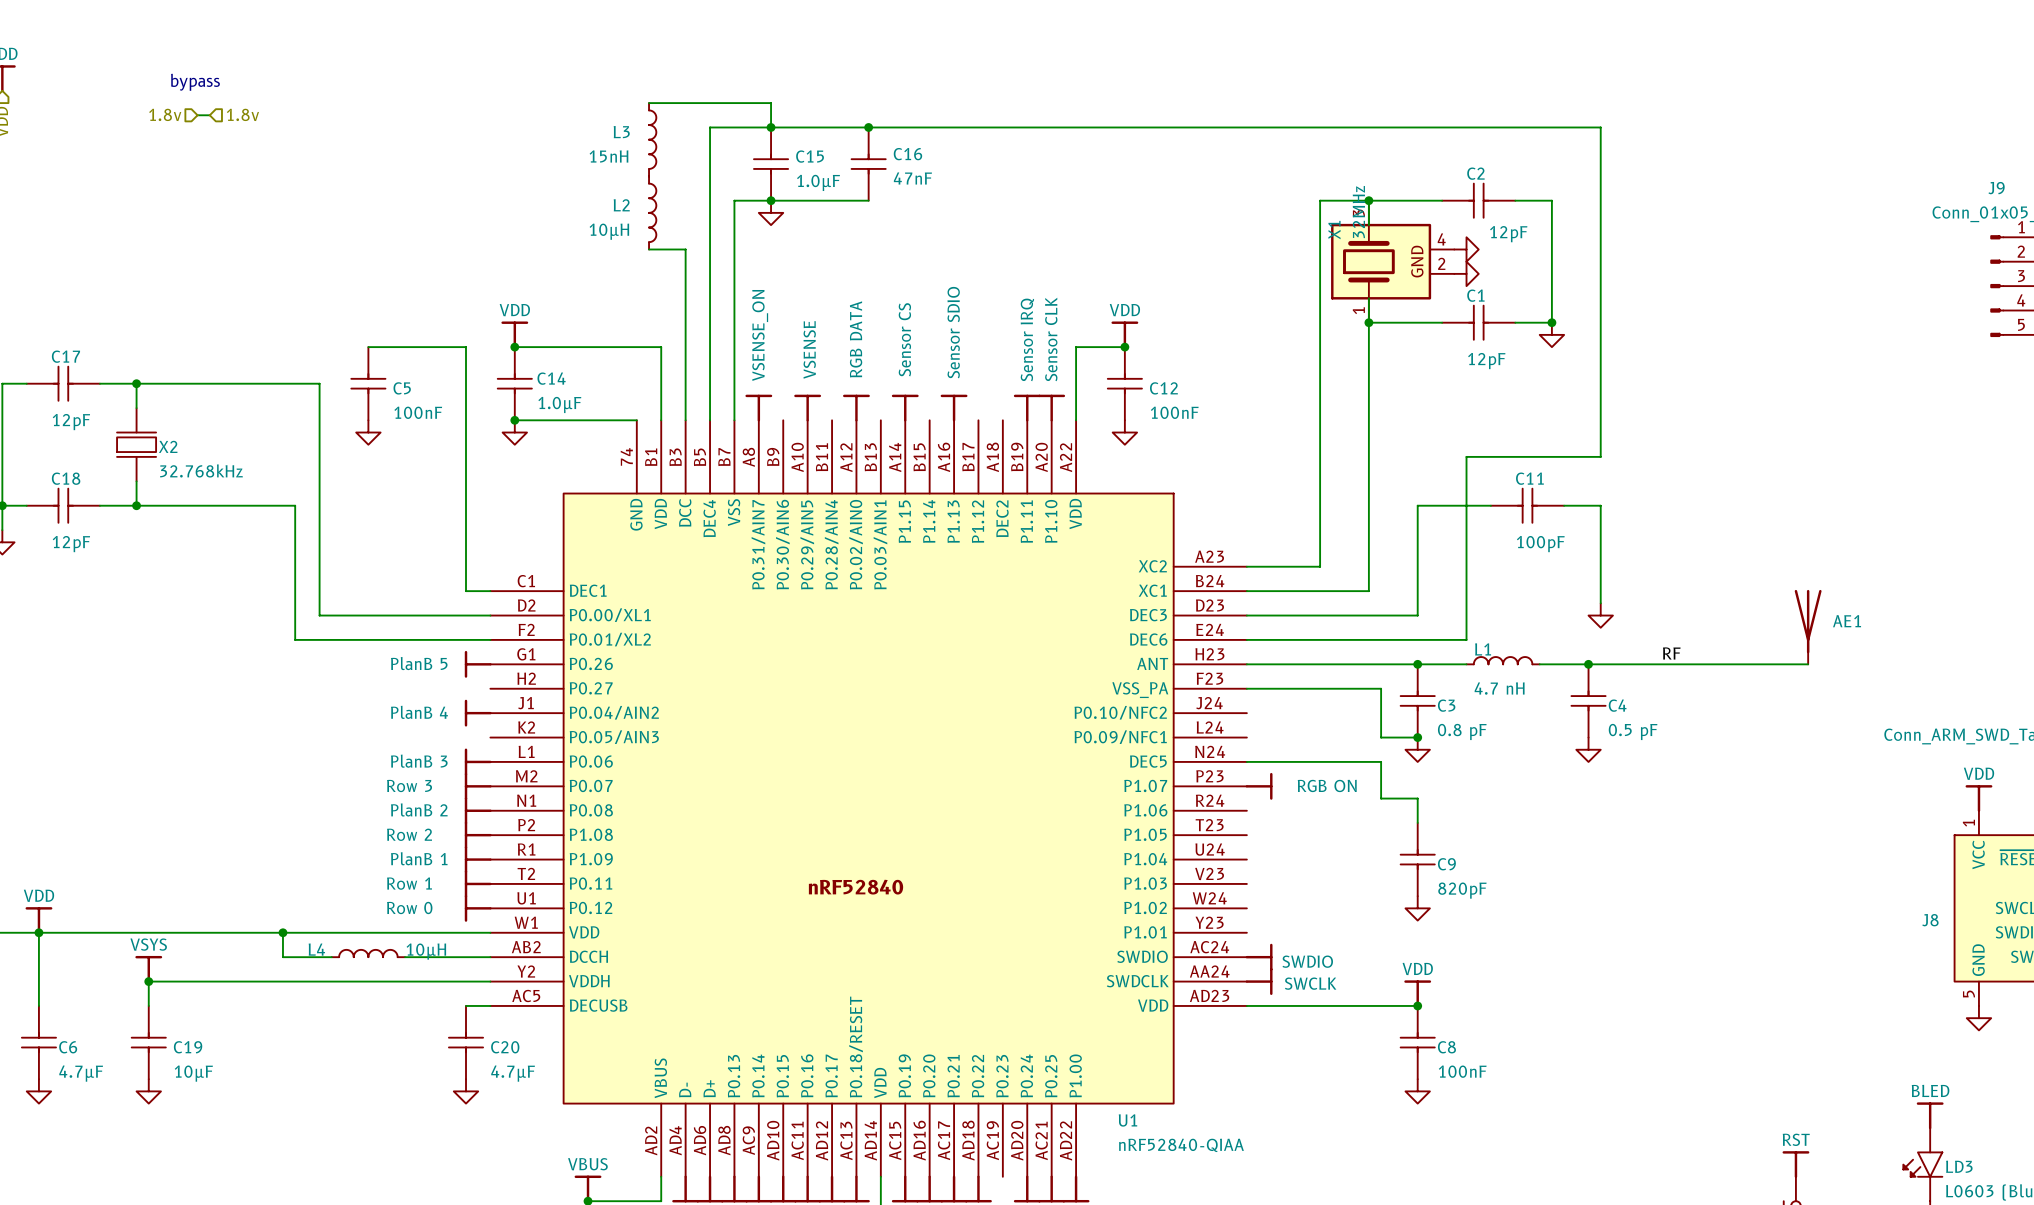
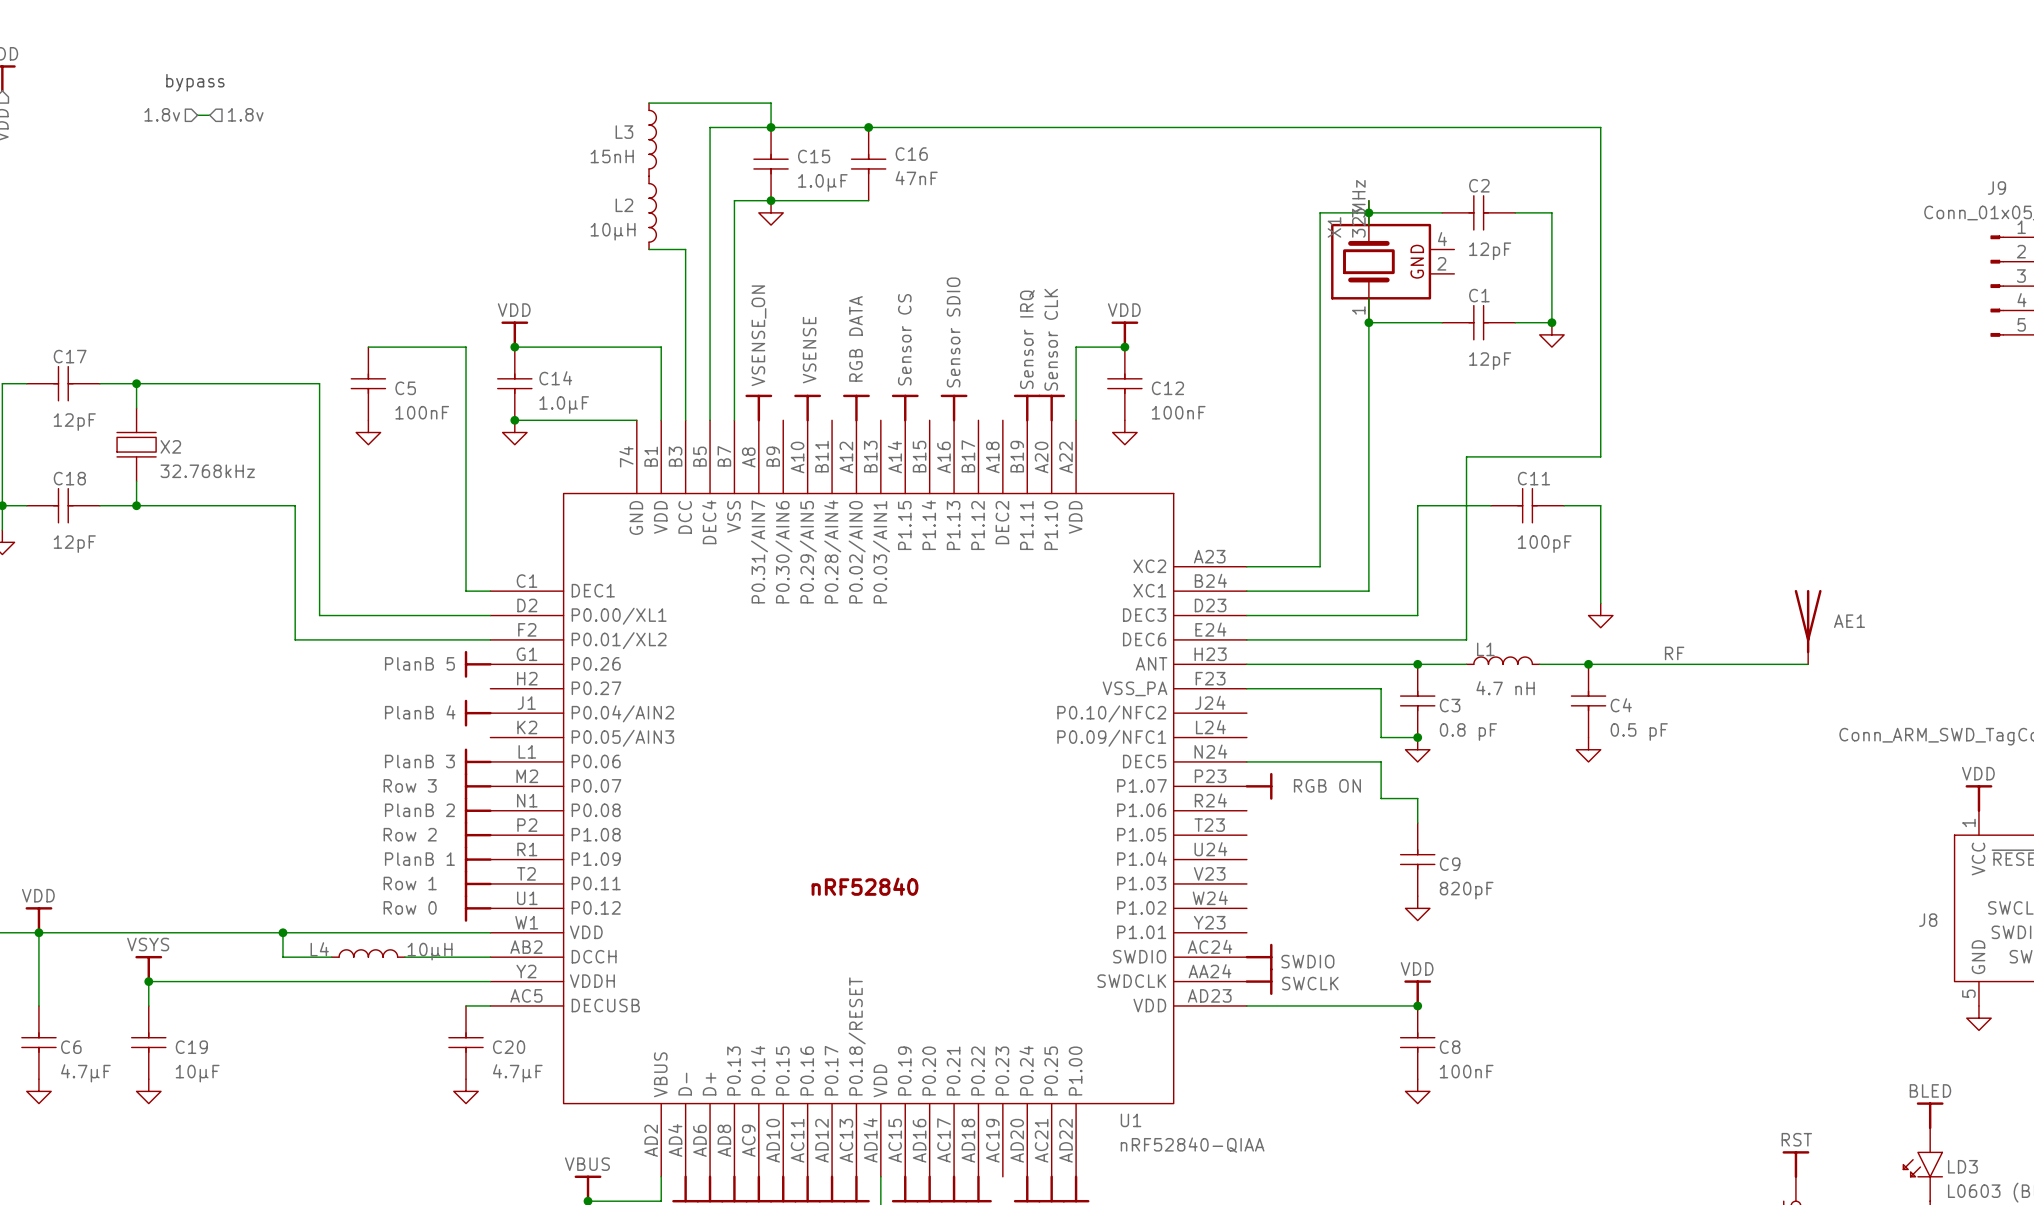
junction position: (1368, 200) -> (1368, 212)
wire: (1442, 200) (1320, 200) (1320, 212) -> (1442, 212) (1320, 212)
C2 position: (1478, 200) -> (1478, 212)
wire: (1515, 200) (1551, 200) (1551, 212) -> (1515, 212) (1551, 212)
C2 value position: 12pF (1508, 234) -> 12pF (1490, 251)
power symbol: (1466, 249) -> none
power symbol: (1466, 273) -> none

